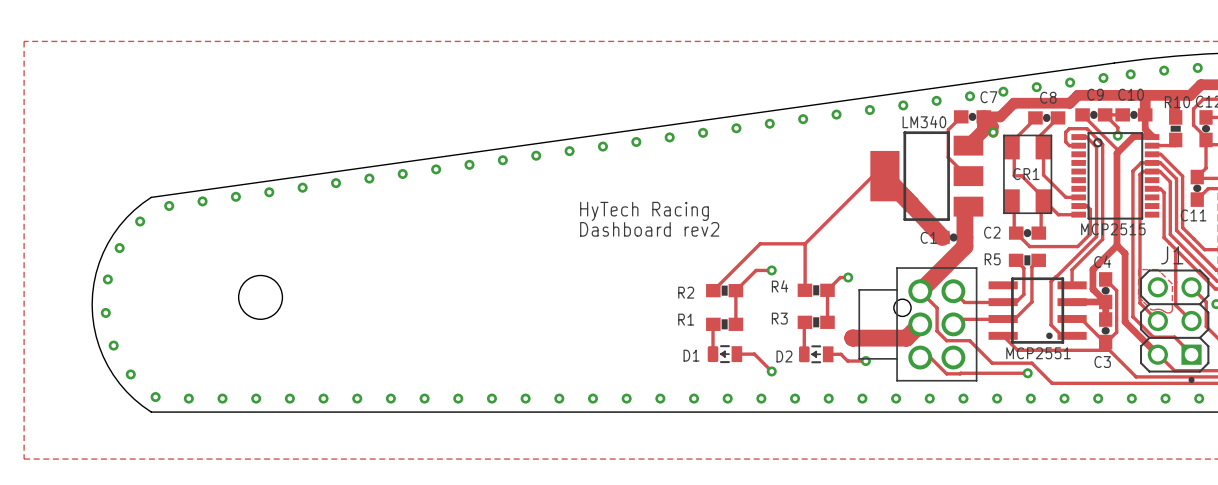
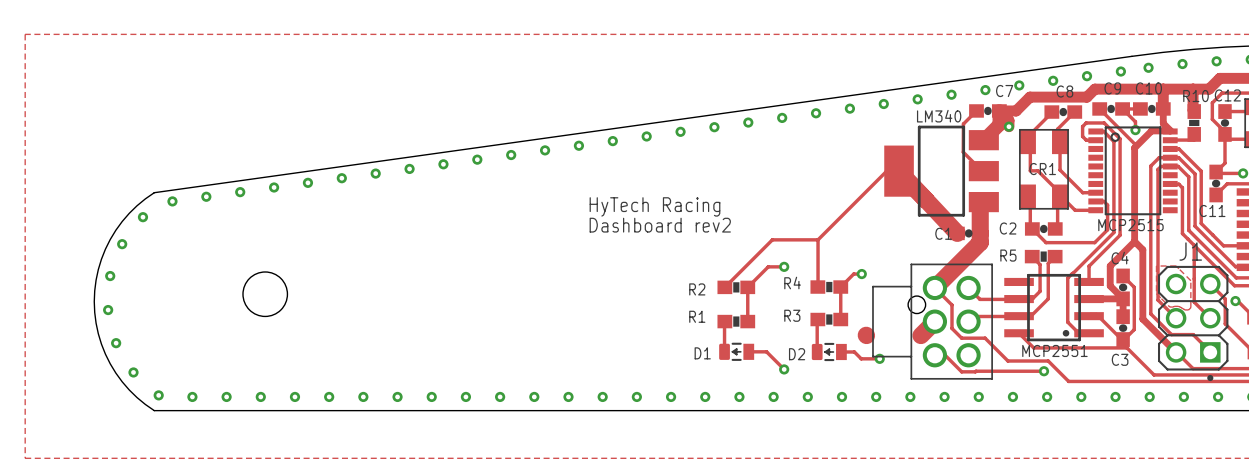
track: (852, 338) (906, 338) -> none

